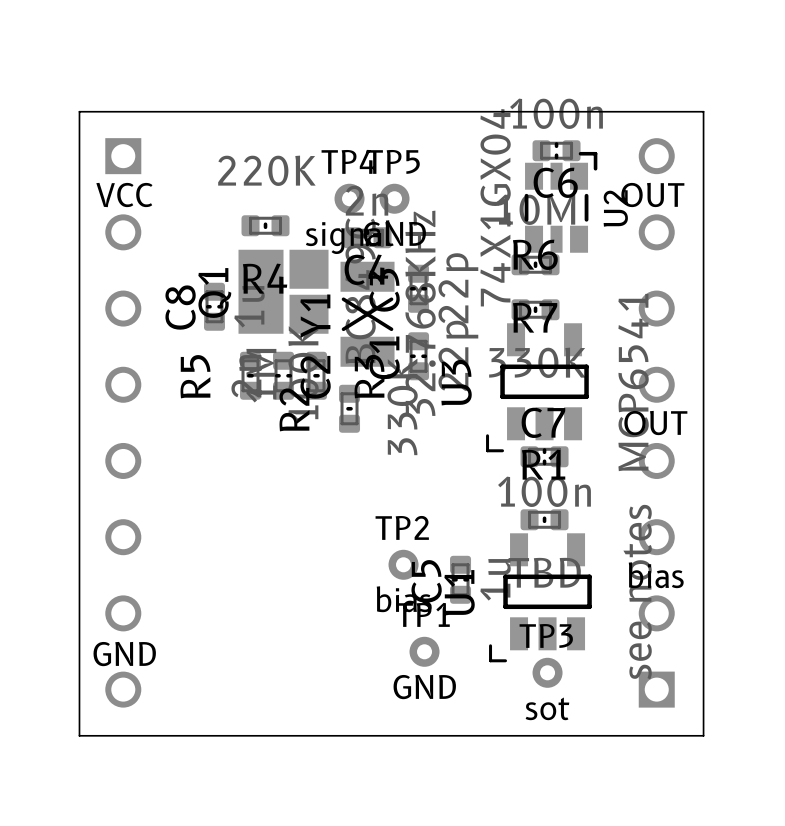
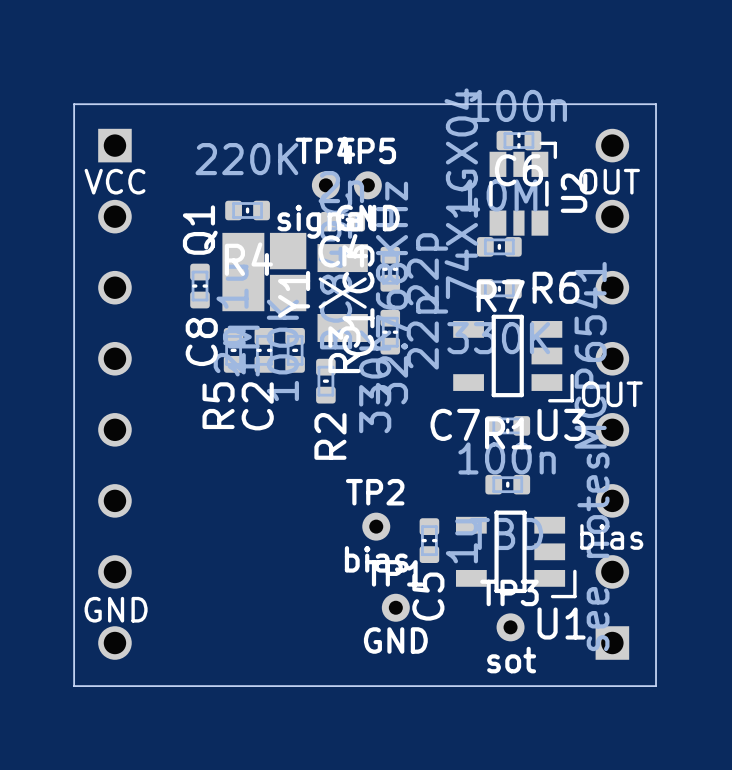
R6 name position: R6 (535, 254) -> R6 (555, 287)
Q1 name position: Q1 (214, 293) -> Q1 (200, 230)
C8 name position: C8 (180, 307) -> C8 (201, 341)
U3 footprint: [486, 323, 589, 453] -> [453, 314, 574, 403]
R5 name position: R5 (195, 376) -> R5 (218, 405)
C2 name position: C2 (315, 377) -> C2 (257, 406)
U3 name position: U3 (456, 382) -> U3 (561, 424)
R2 name position: R2 (294, 409) -> R2 (330, 436)
C7 name position: C7 (543, 422) -> C7 (455, 424)
U1 footprint: [489, 533, 592, 663] -> [455, 510, 577, 599]
C5 name position: C5 (426, 581) -> C5 (428, 596)
U1 name position: U1 (459, 592) -> U1 (561, 623)

